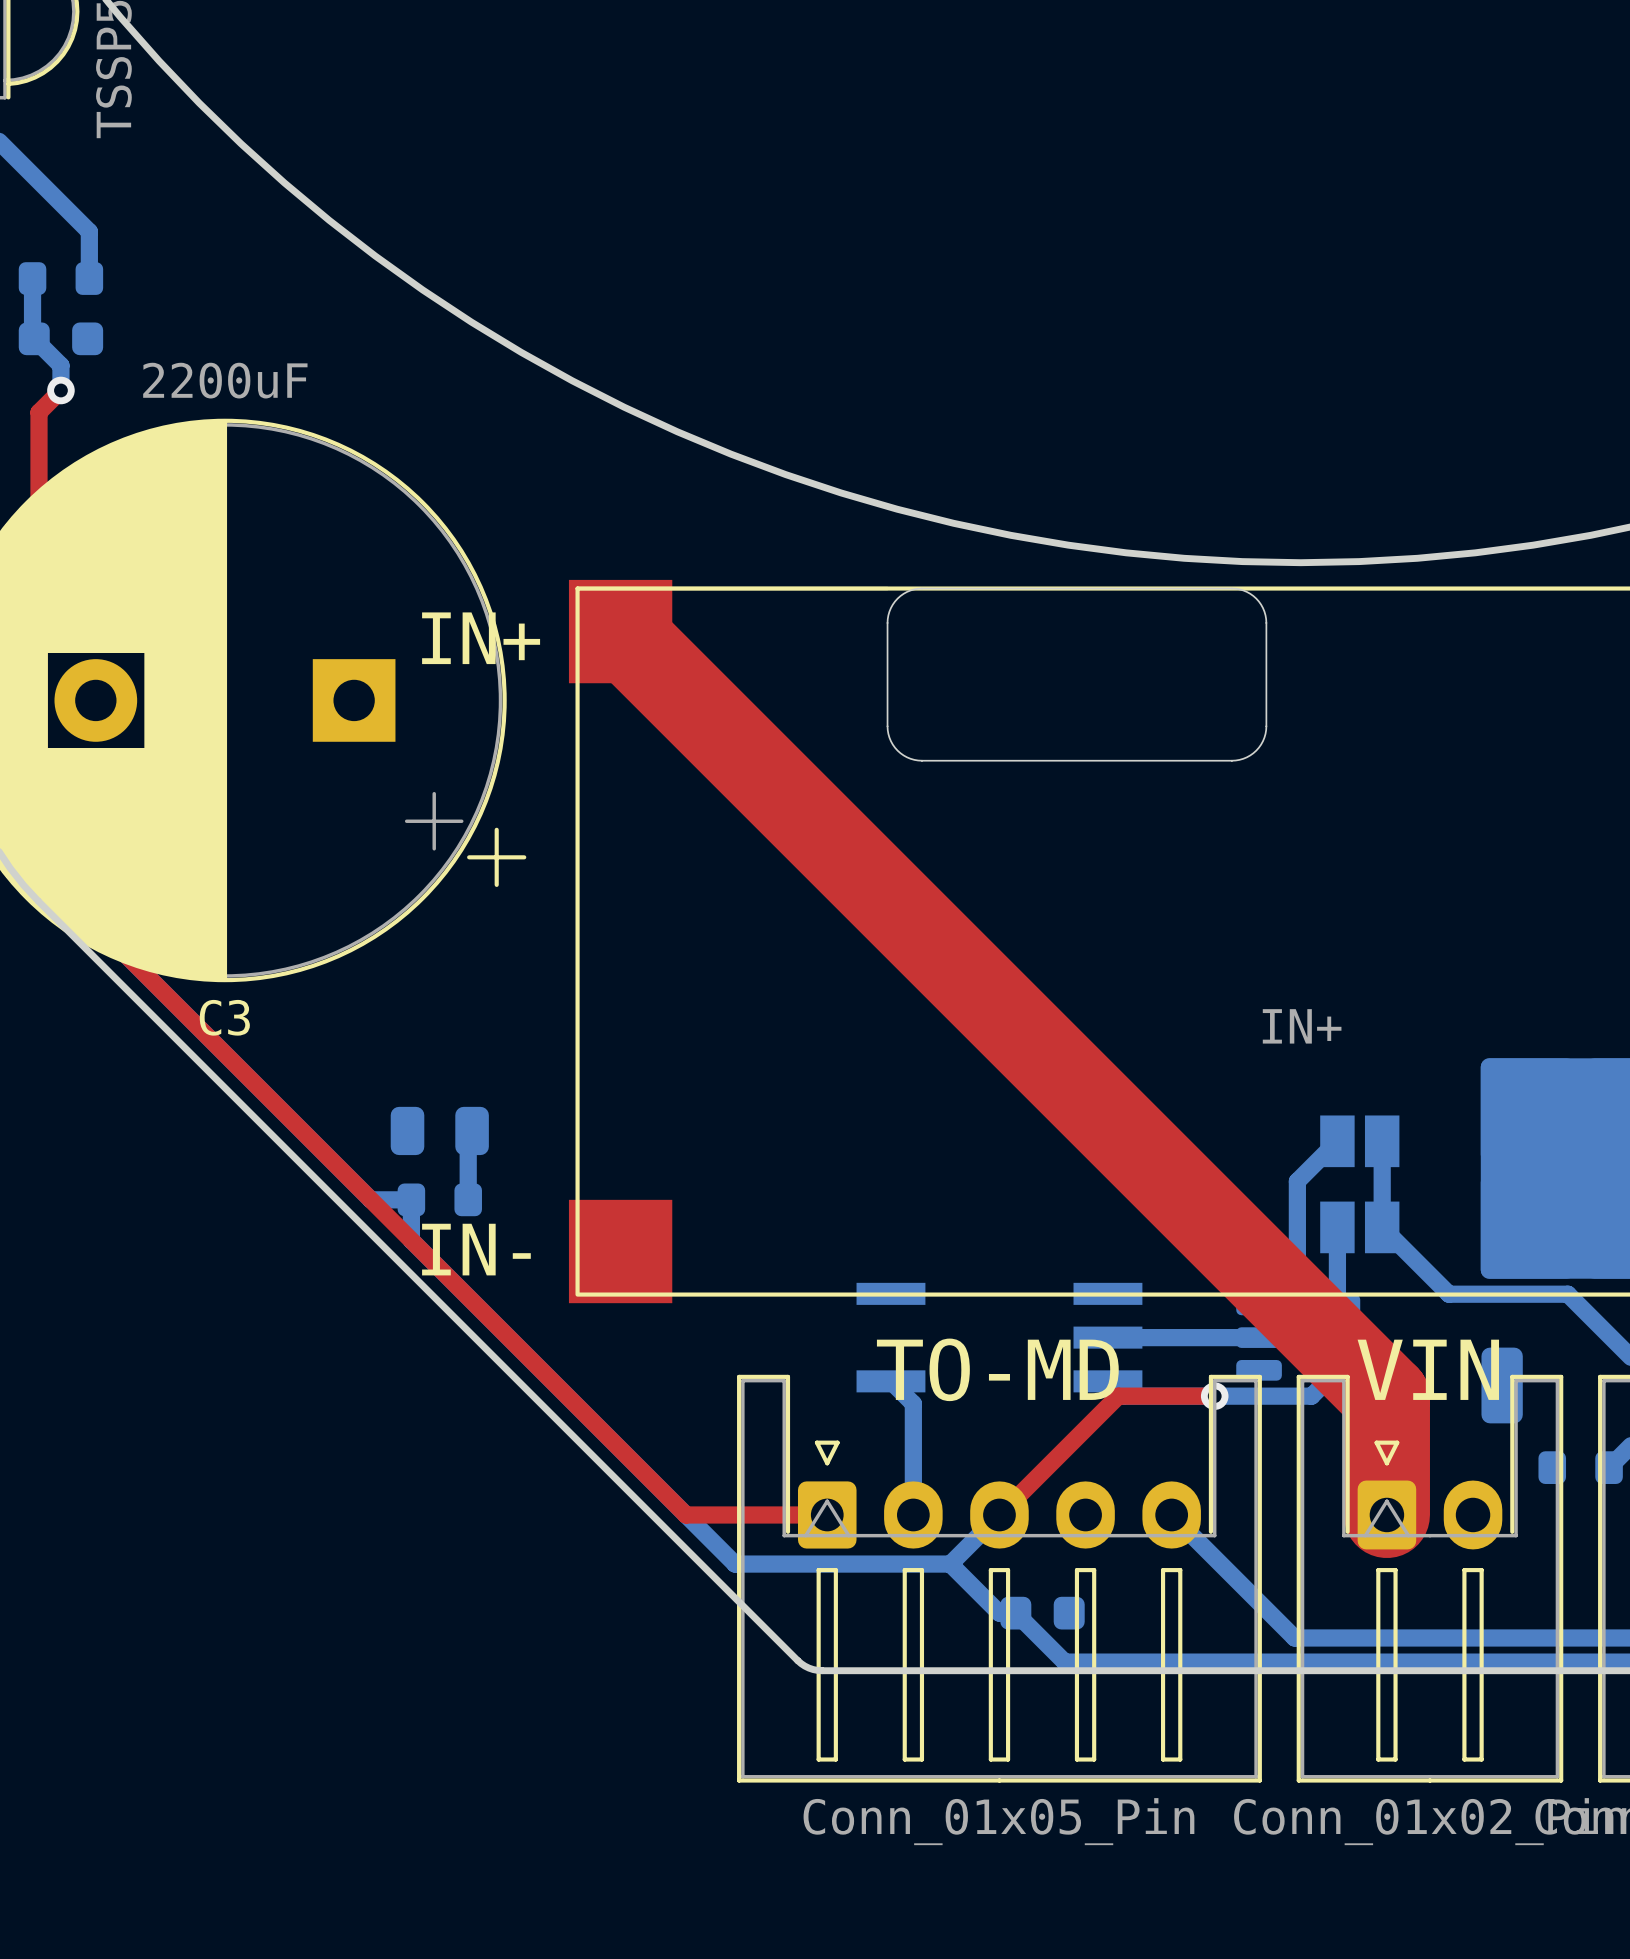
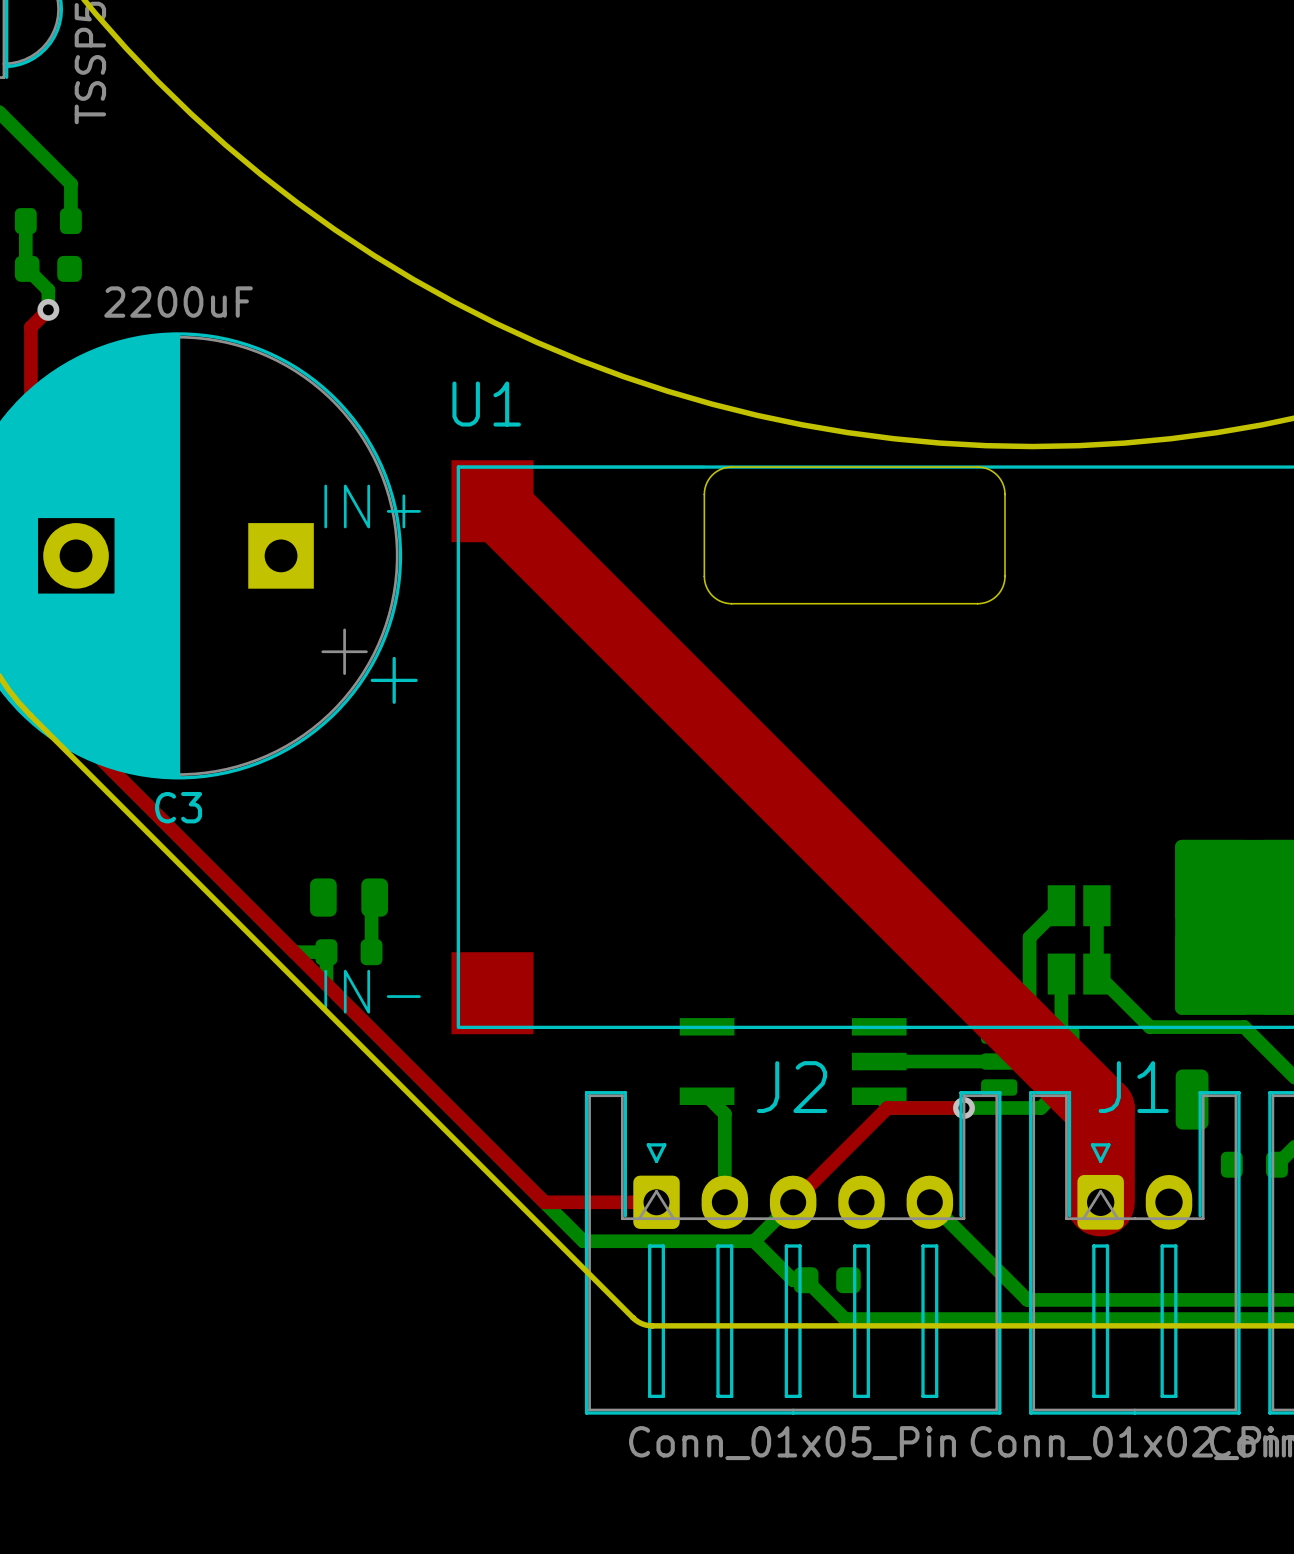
IN+ name: IN+ (1302, 1026) -> U1 (486, 404)
TO-MD name: TO-MD (997, 1369) -> J2 (792, 1087)
VIN name: VIN (1428, 1369) -> J1 (1133, 1087)

